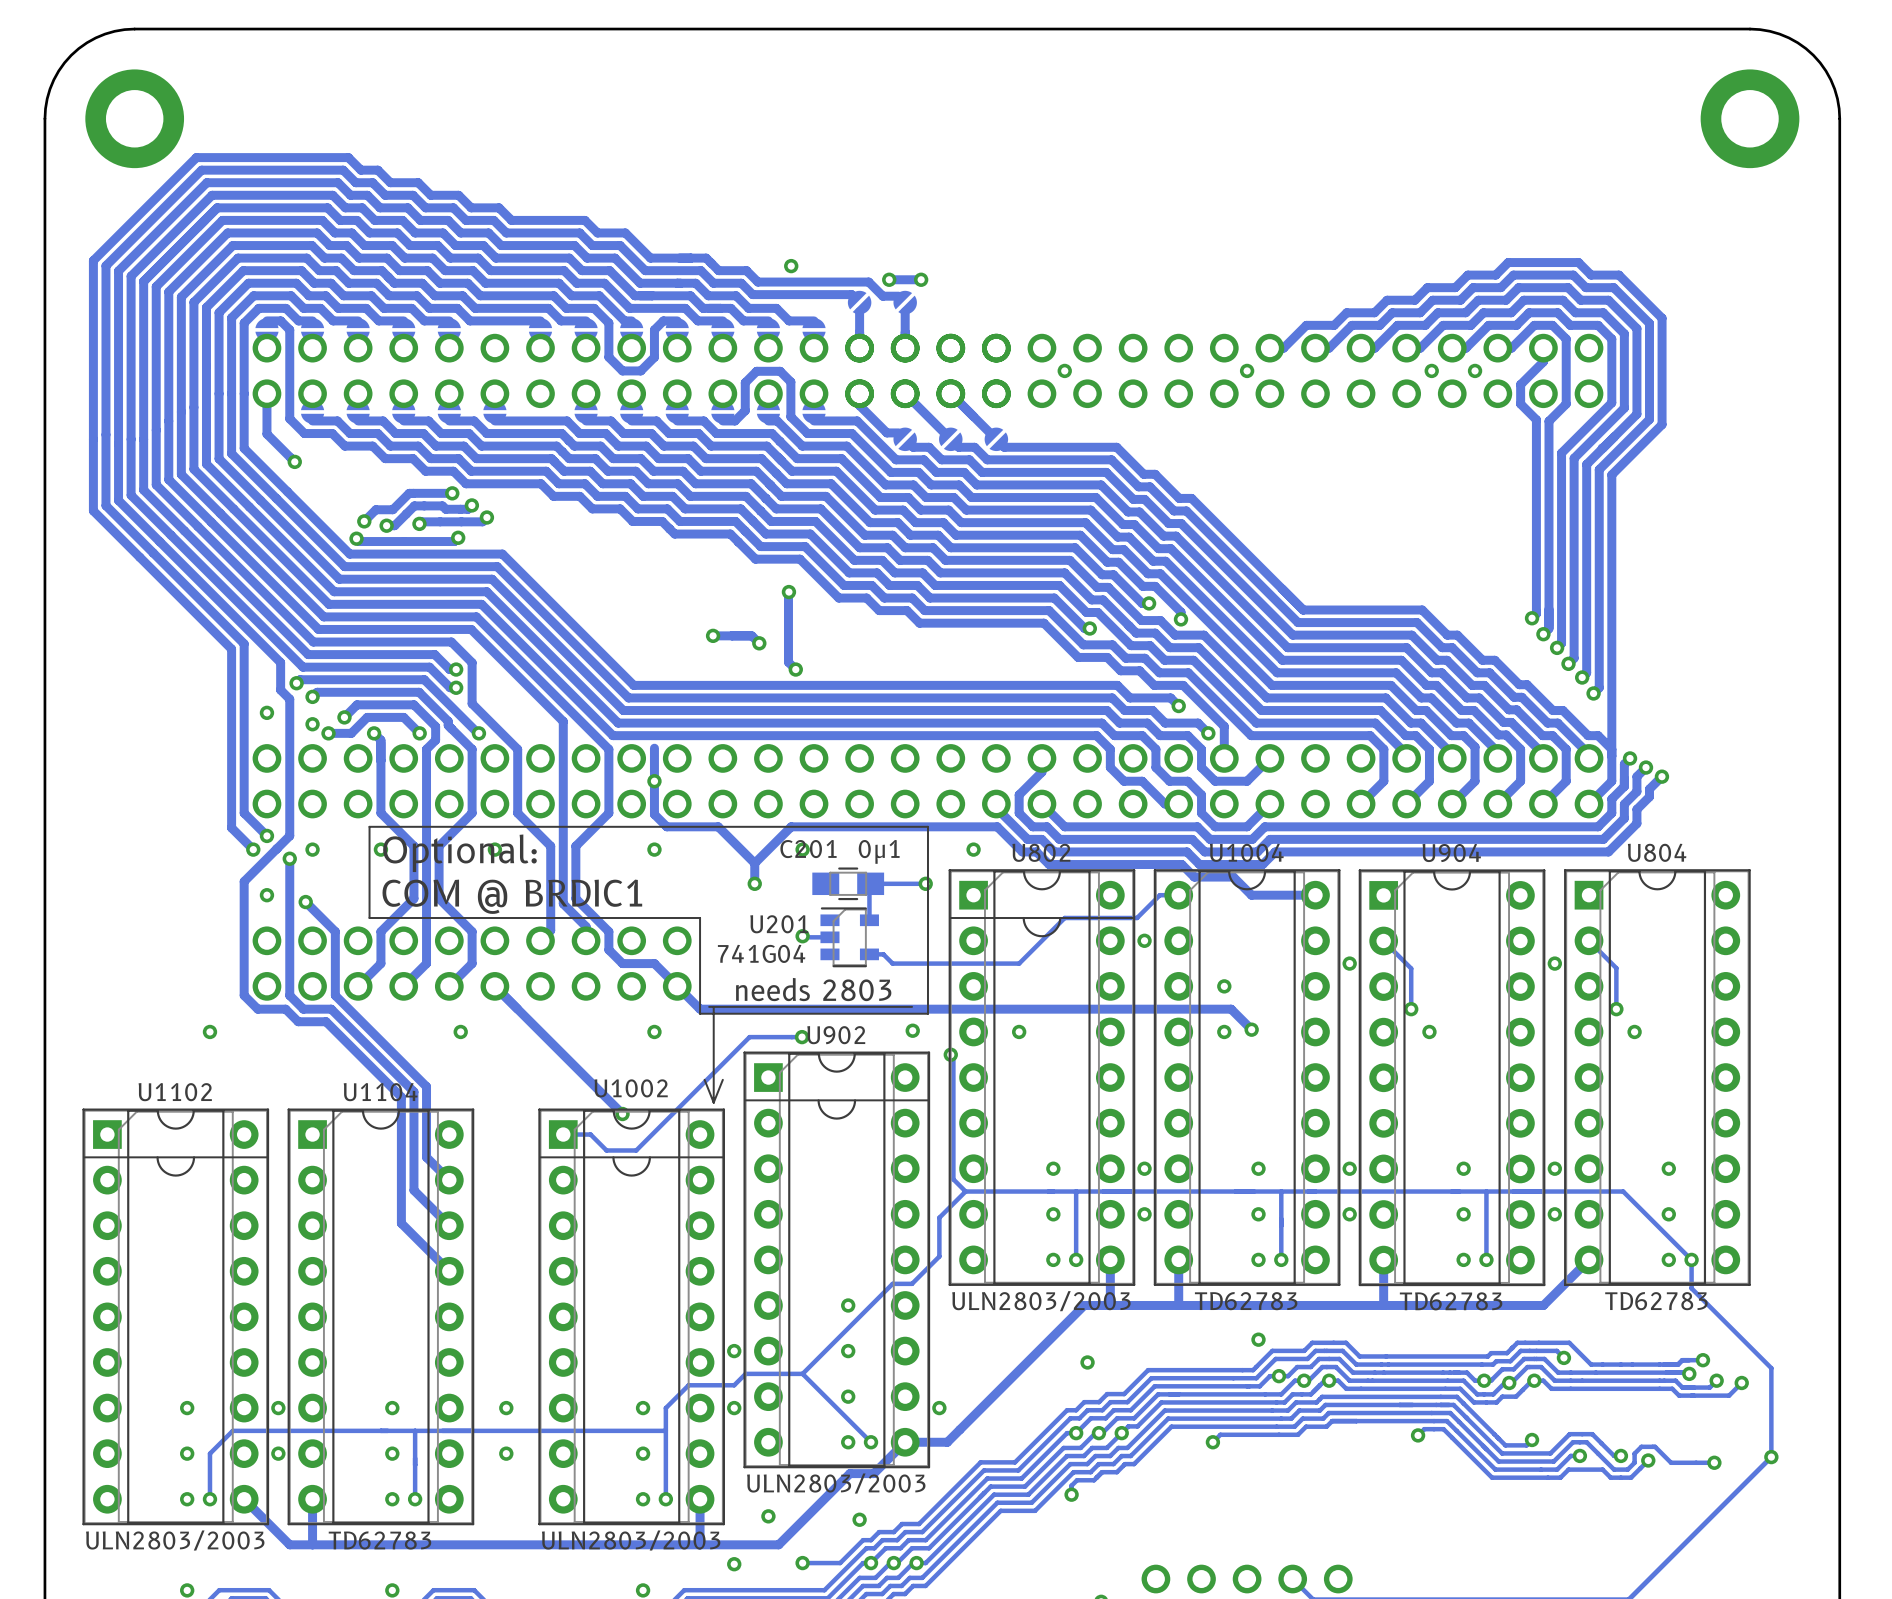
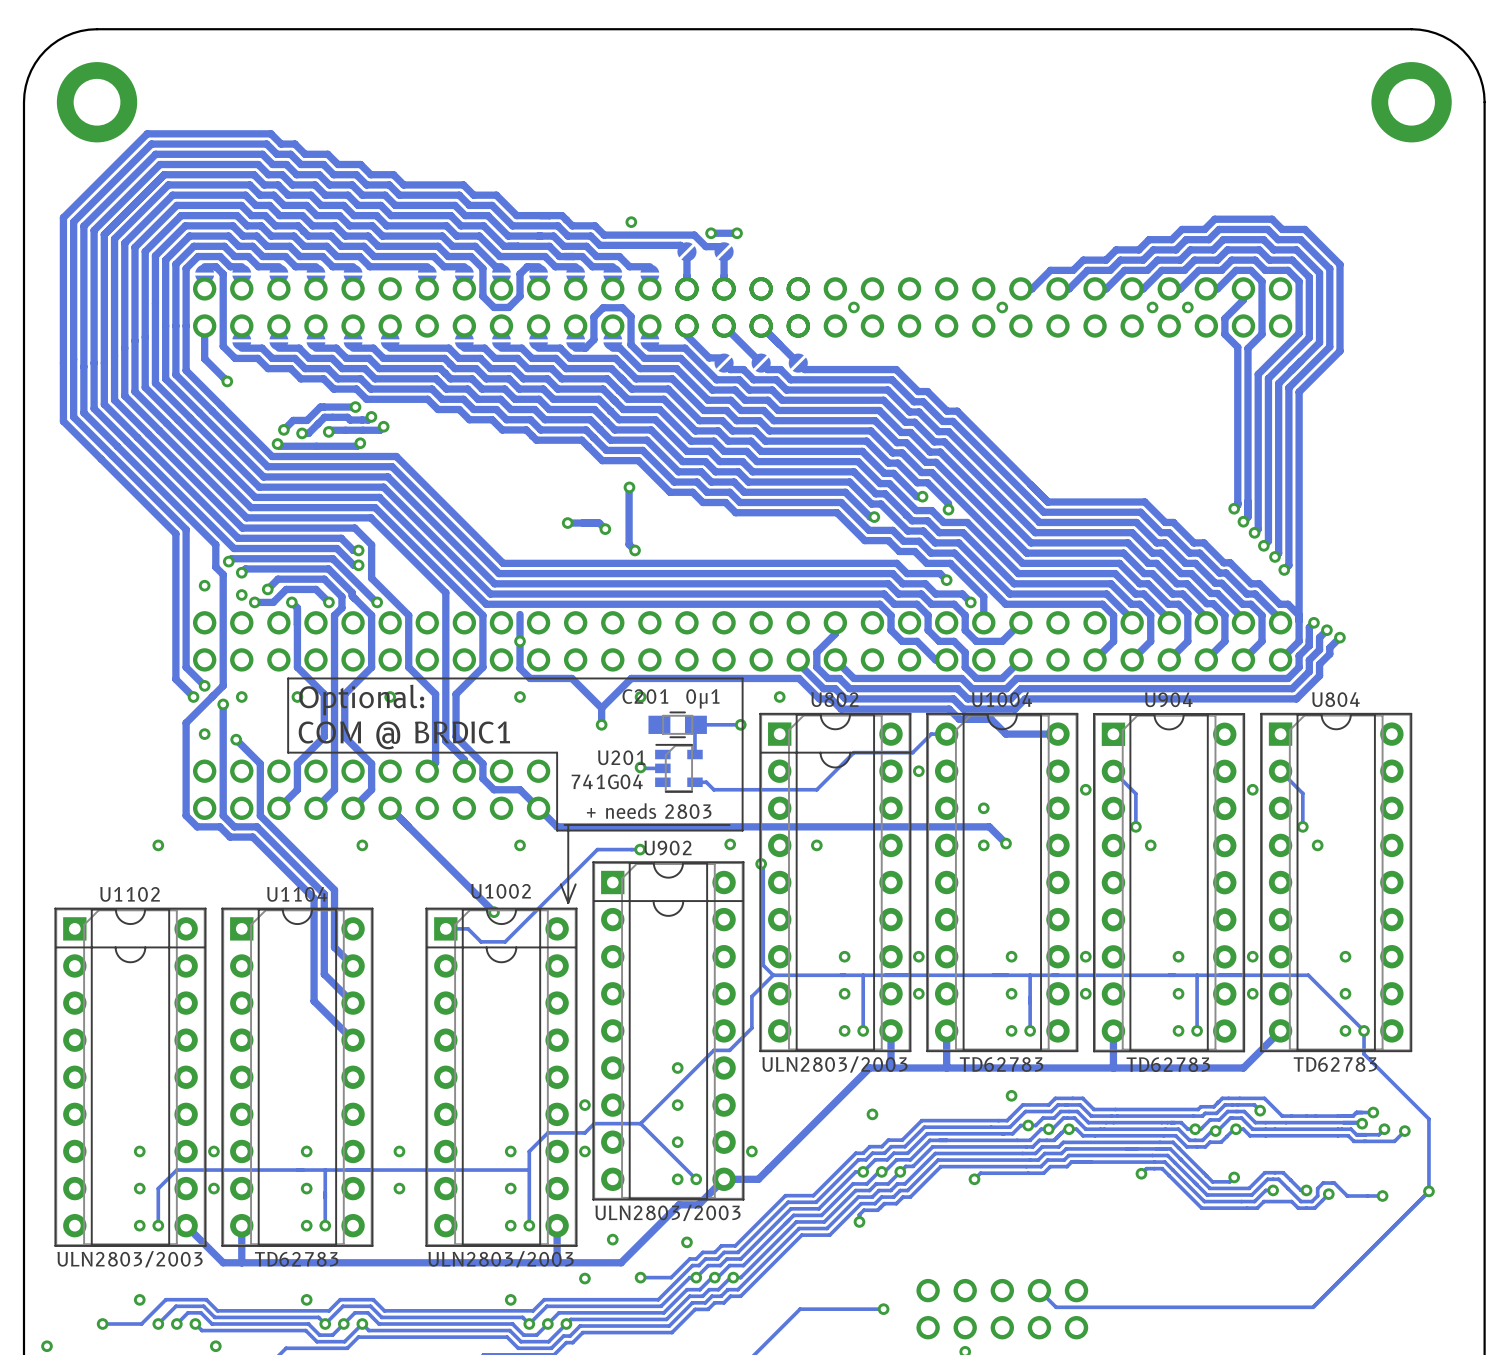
text: needs 2803 (813, 989) -> + needs 2803 (649, 811)

